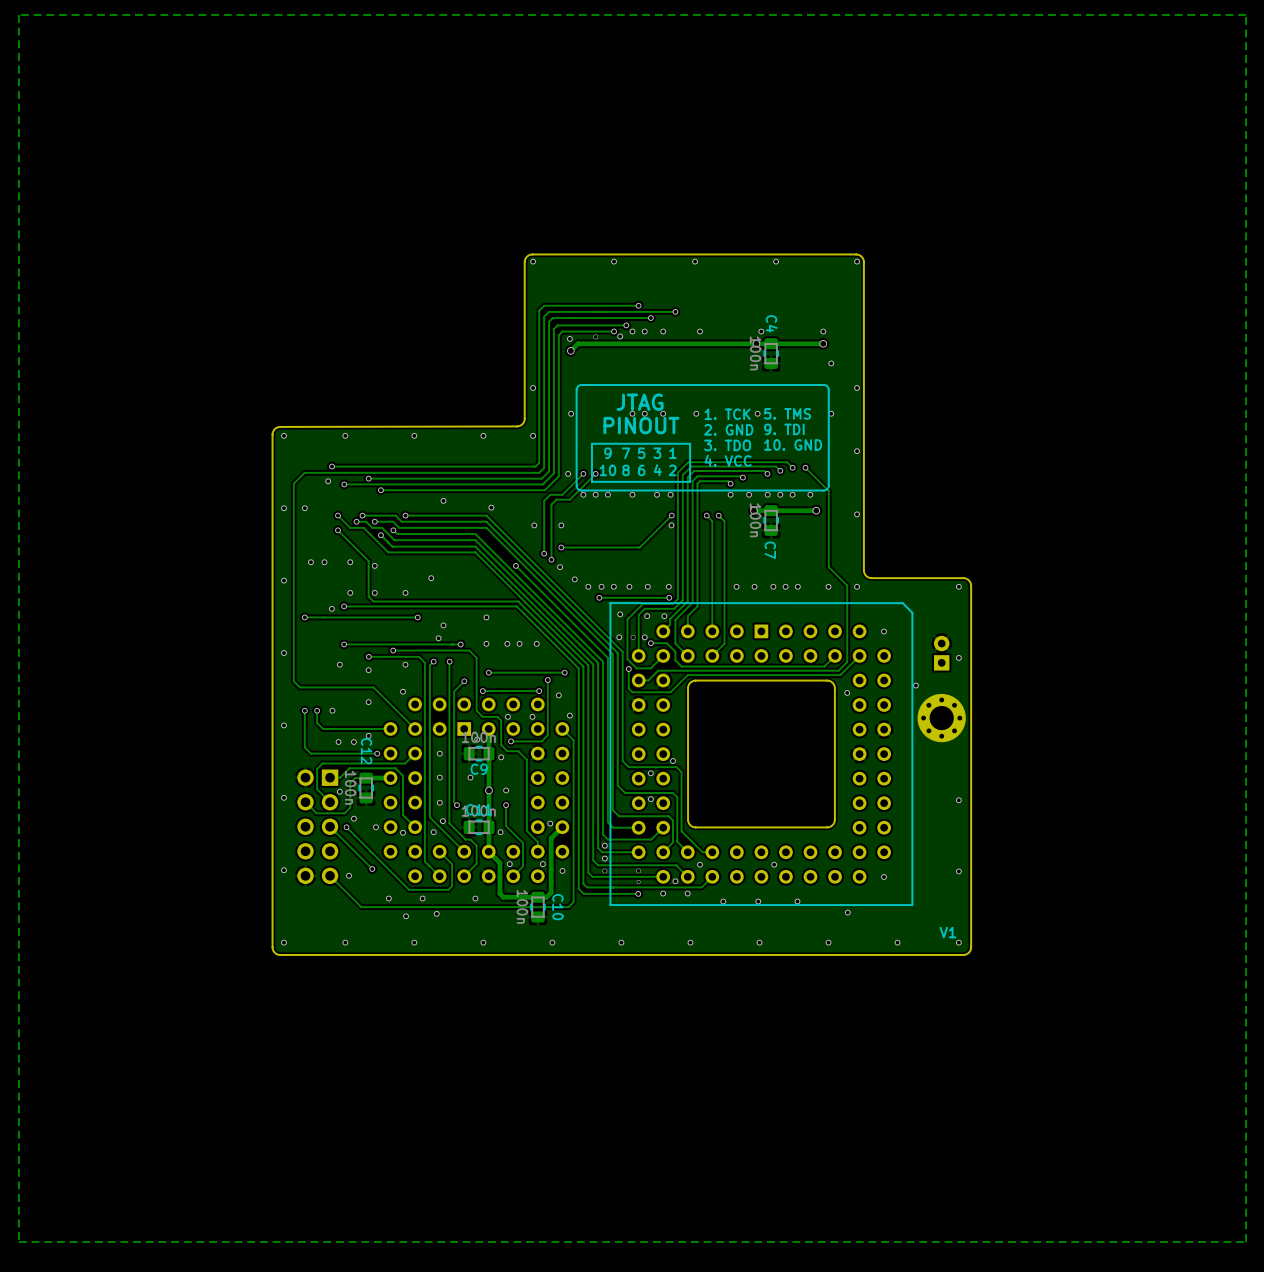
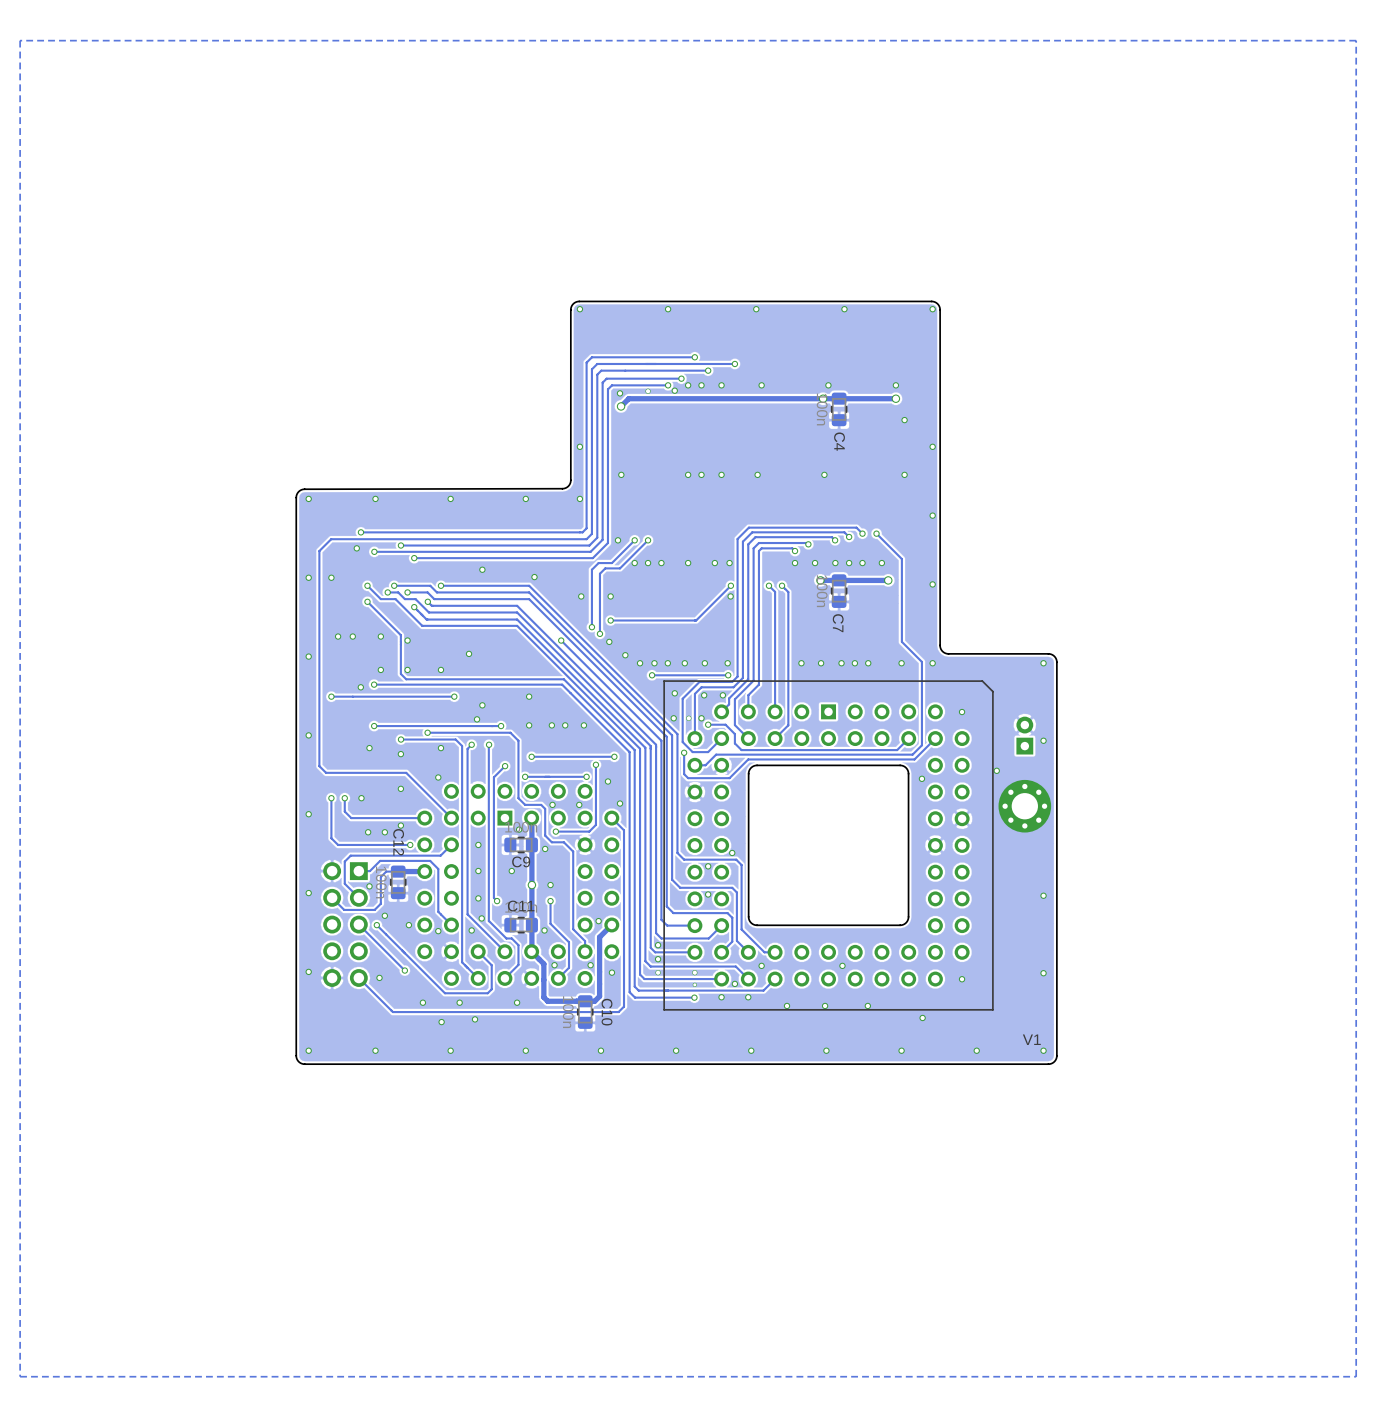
C4 name position: C4 (771, 323) -> C4 (839, 441)
line: (823, 384) (579, 385) (576, 389) (577, 487) (581, 490) (825, 490) (828, 485) (828, 389) (823, 384) -> none
text: JTAG (640, 402) -> none
text: 5. TMS (787, 413) -> none
text: 1. TCK (727, 414) -> none
text: PINOUT (641, 425) -> none
text: 2. GND (728, 429) -> none
text: 9. TDI (784, 429) -> none
line: (690, 443) (690, 481) (591, 481) (591, 443) (690, 443) -> none
text: 10. GND (793, 444) -> none
text: 3. TDO (727, 445) -> none
text: 9 (607, 453) -> none
text: 7 (626, 453) -> none
text: 5 (641, 453) -> none
text: 3 (657, 453) -> none
text: 1 (672, 453) -> none
text: 4. VCC (728, 460) -> none
text: 10 (607, 470) -> none
text: 8 (626, 470) -> none
text: 6 (641, 470) -> none
text: 4 (657, 470) -> none
text: 2 (672, 470) -> none

